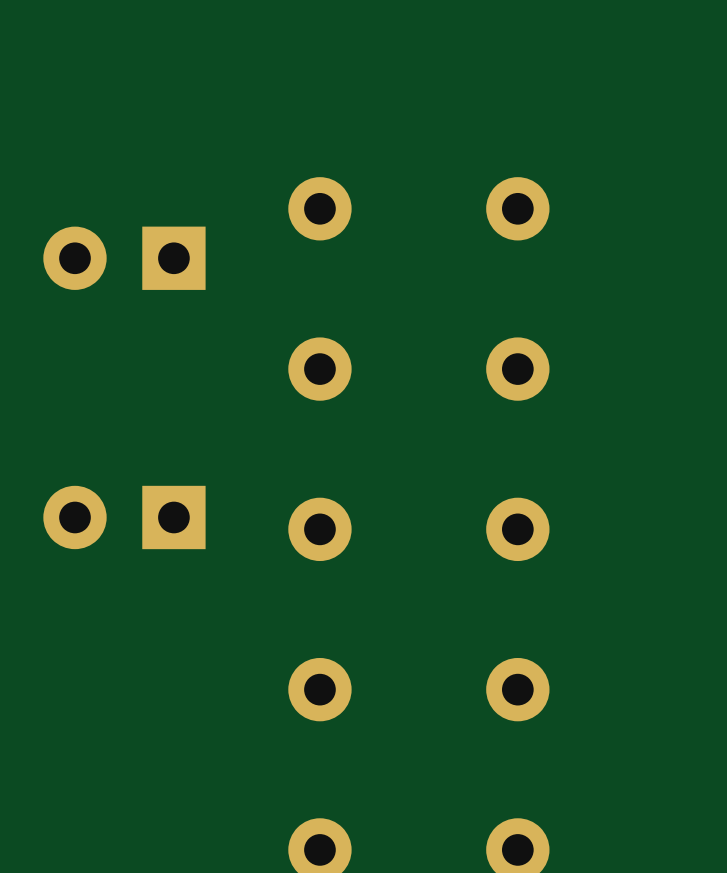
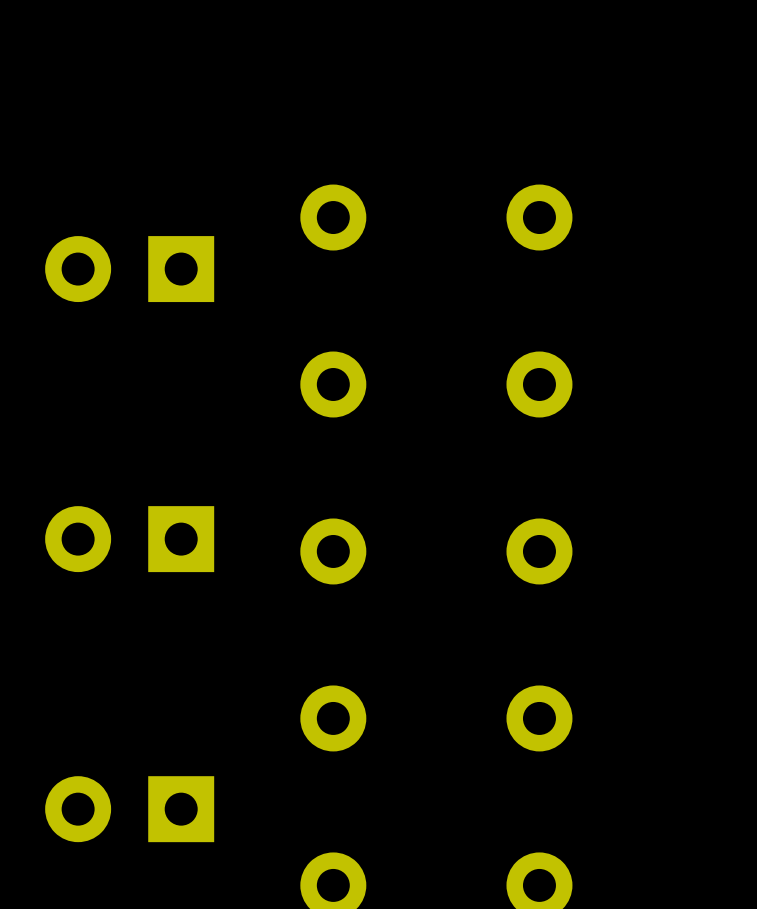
part: none -> (129, 809)

